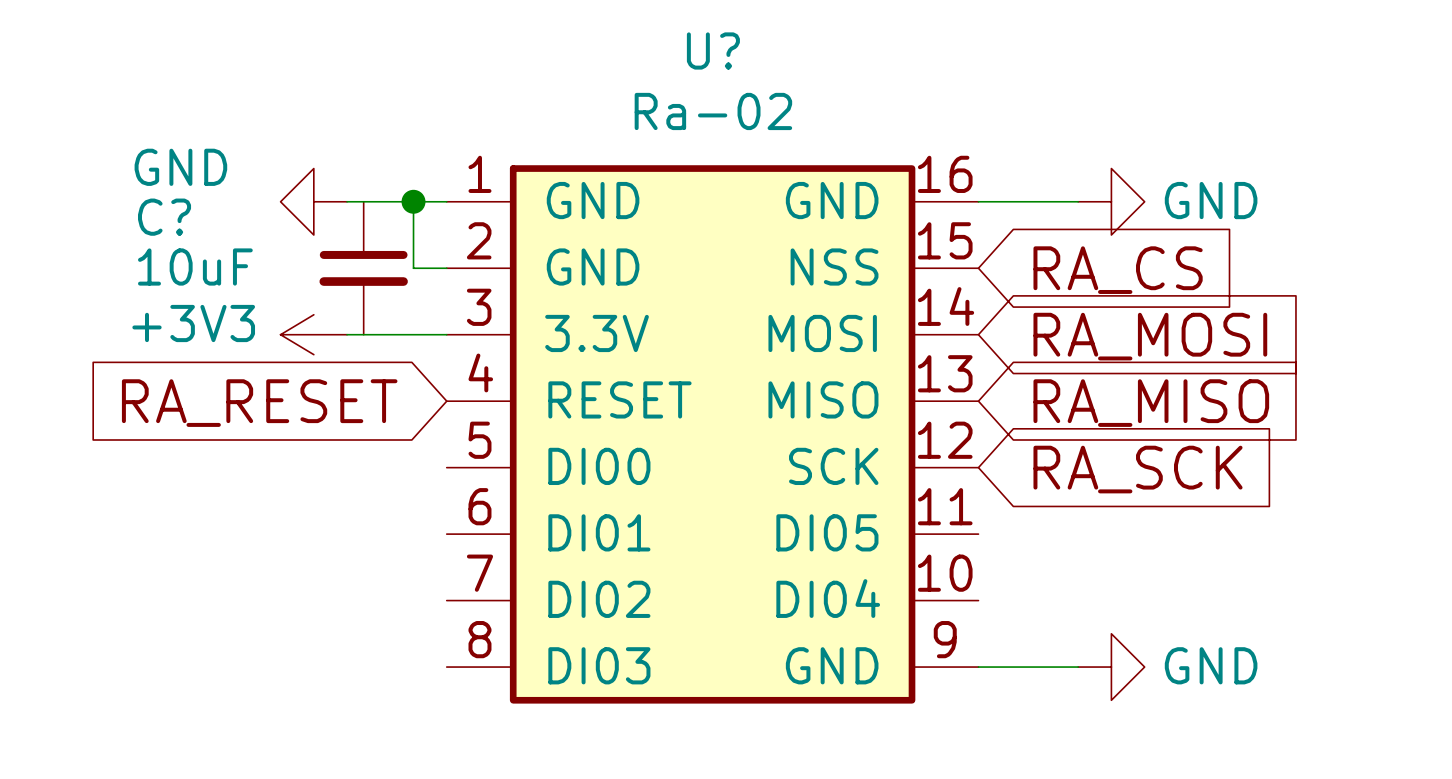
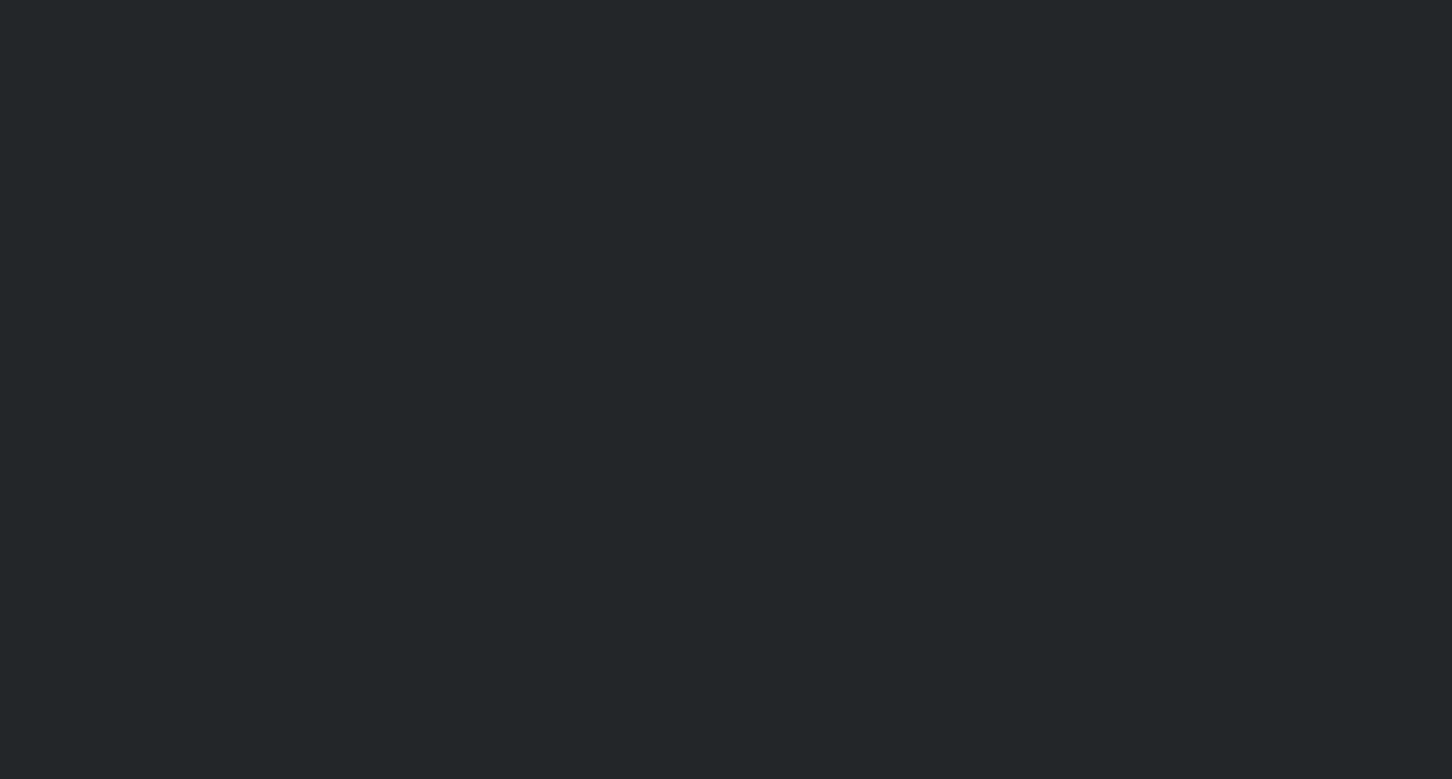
power symbol: GND (313, 201) -> none
wire: (347, 201) (446, 201) -> none
wire: (413, 201) (413, 268) (446, 268) -> none
junction: (413, 201) -> none
wire: (978, 201) (1078, 201) -> none
power symbol: GND (1111, 201) -> none
C?: 10uF (363, 268) -> none
global label: RA_CS (1118, 270) -> none
power symbol: +3V3 (313, 334) -> none
wire: (347, 334) (446, 334) -> none
global label: RA_MOSI (1150, 336) -> none
global label: RA_RESET (259, 403) -> none
global label: RA_MISO (1151, 403) -> none
U?: Ra-02 (712, 434) -> none
global label: RA_SCK (1138, 469) -> none
wire: (978, 667) (1078, 667) -> none
power symbol: GND (1111, 667) -> none

